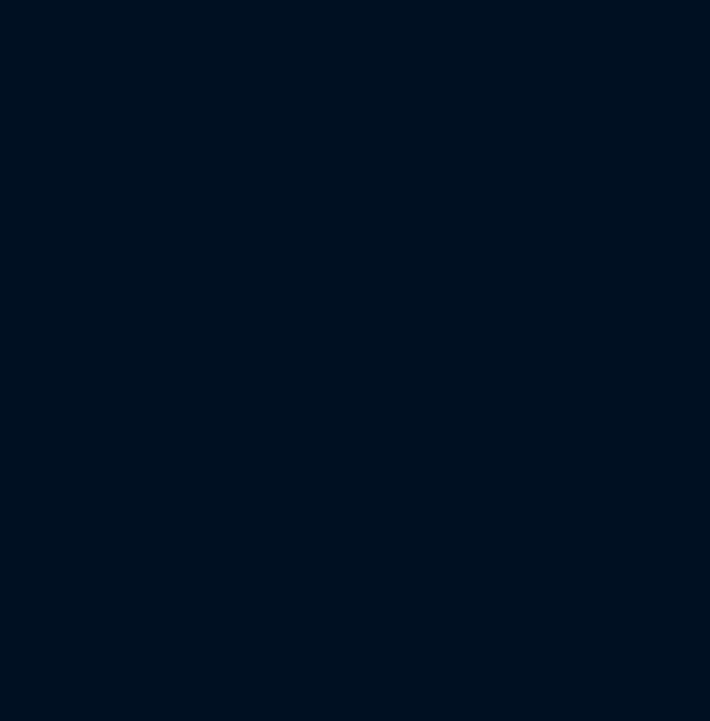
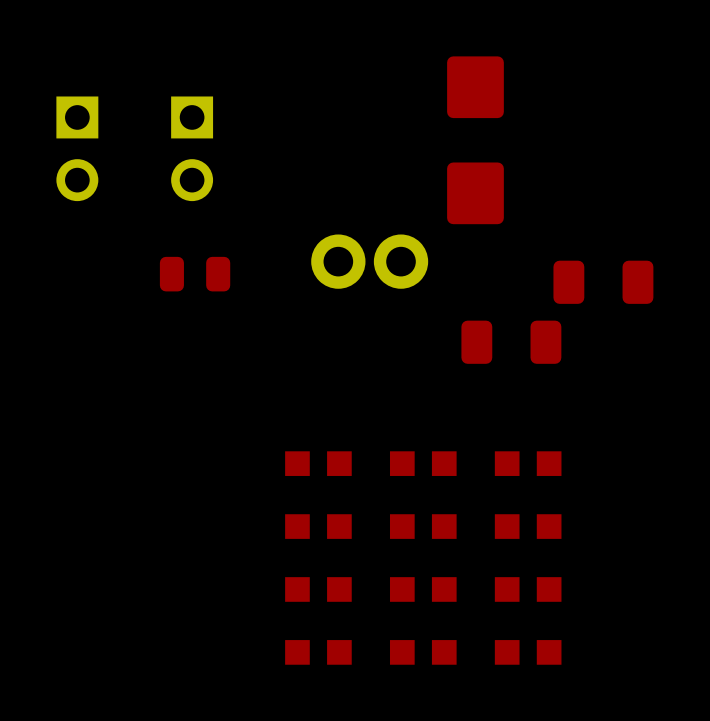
part: none -> (475, 140)
part: none -> (77, 148)
part: none -> (192, 148)
part: none -> (369, 261)
part: none -> (195, 274)
part: none -> (603, 282)
part: none -> (511, 342)
part: none -> (318, 463)
part: none -> (423, 463)
part: none -> (528, 463)
part: none -> (318, 526)
part: none -> (423, 526)
part: none -> (528, 526)
part: none -> (318, 589)
part: none -> (423, 589)
part: none -> (528, 589)
part: none -> (318, 652)
part: none -> (423, 652)
part: none -> (528, 652)

